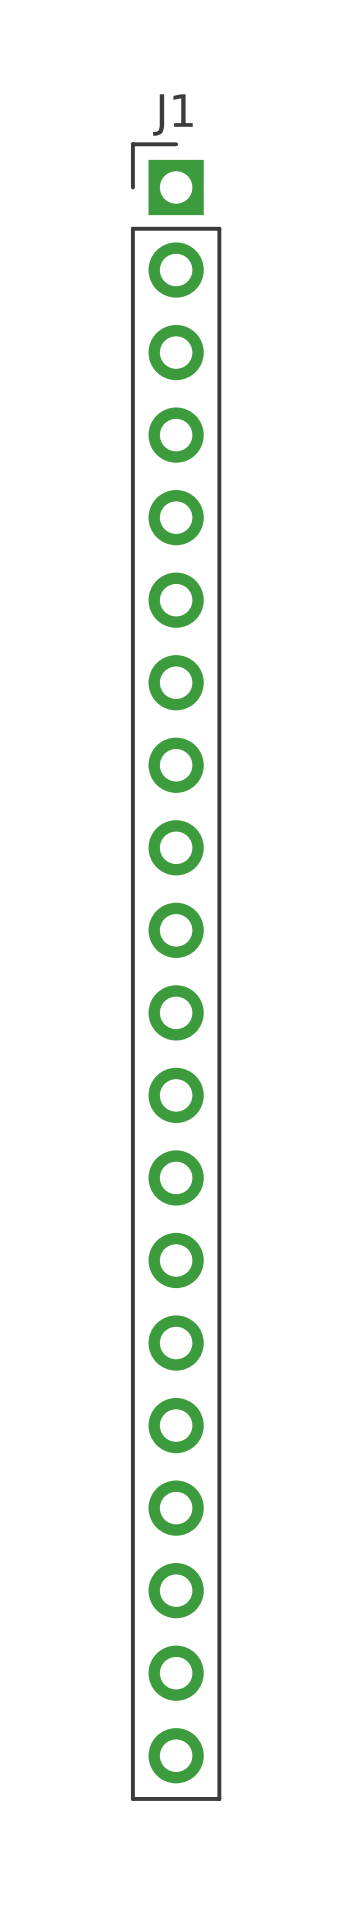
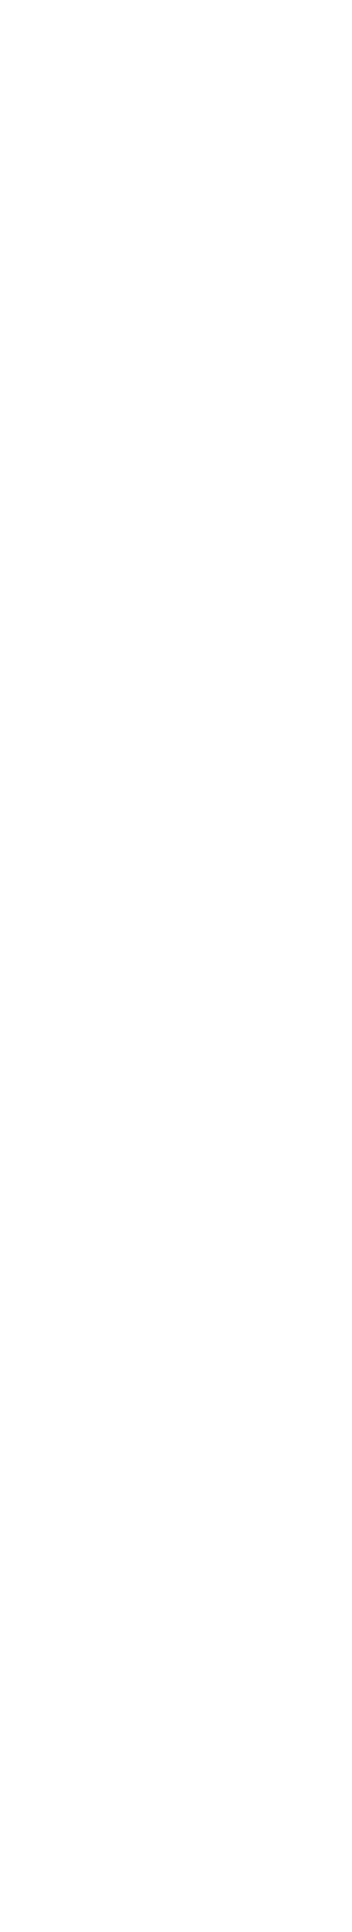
J1: (176, 971) -> none

